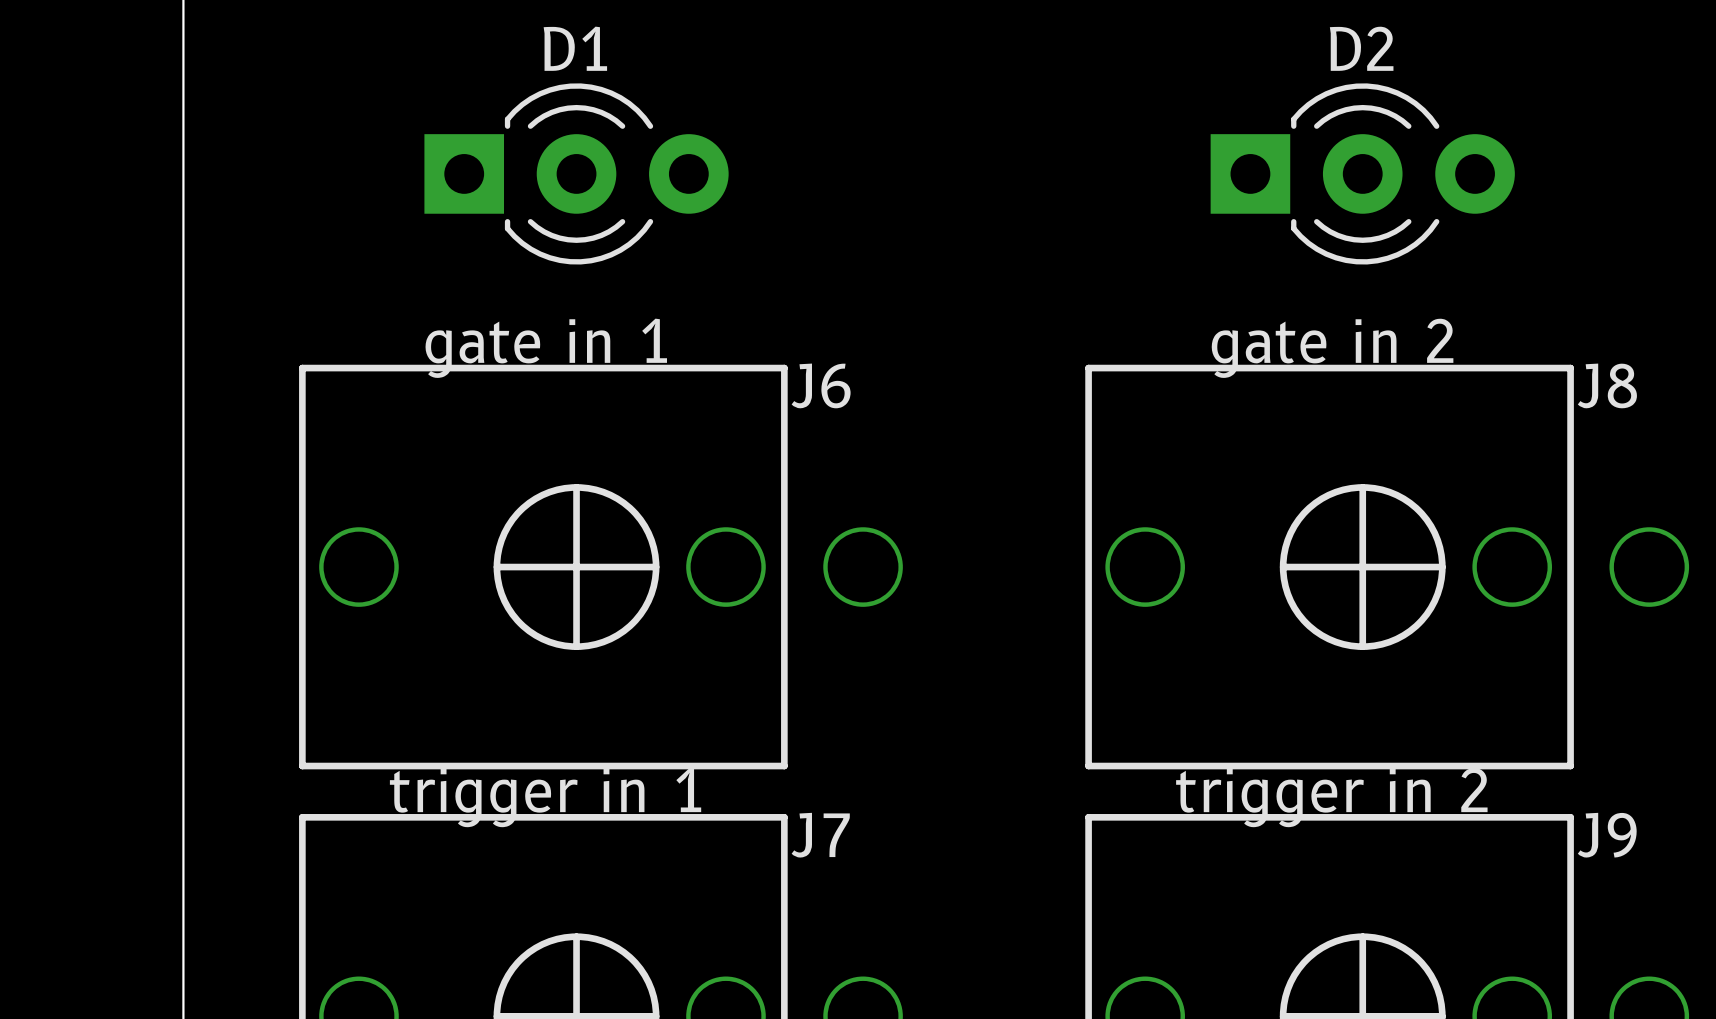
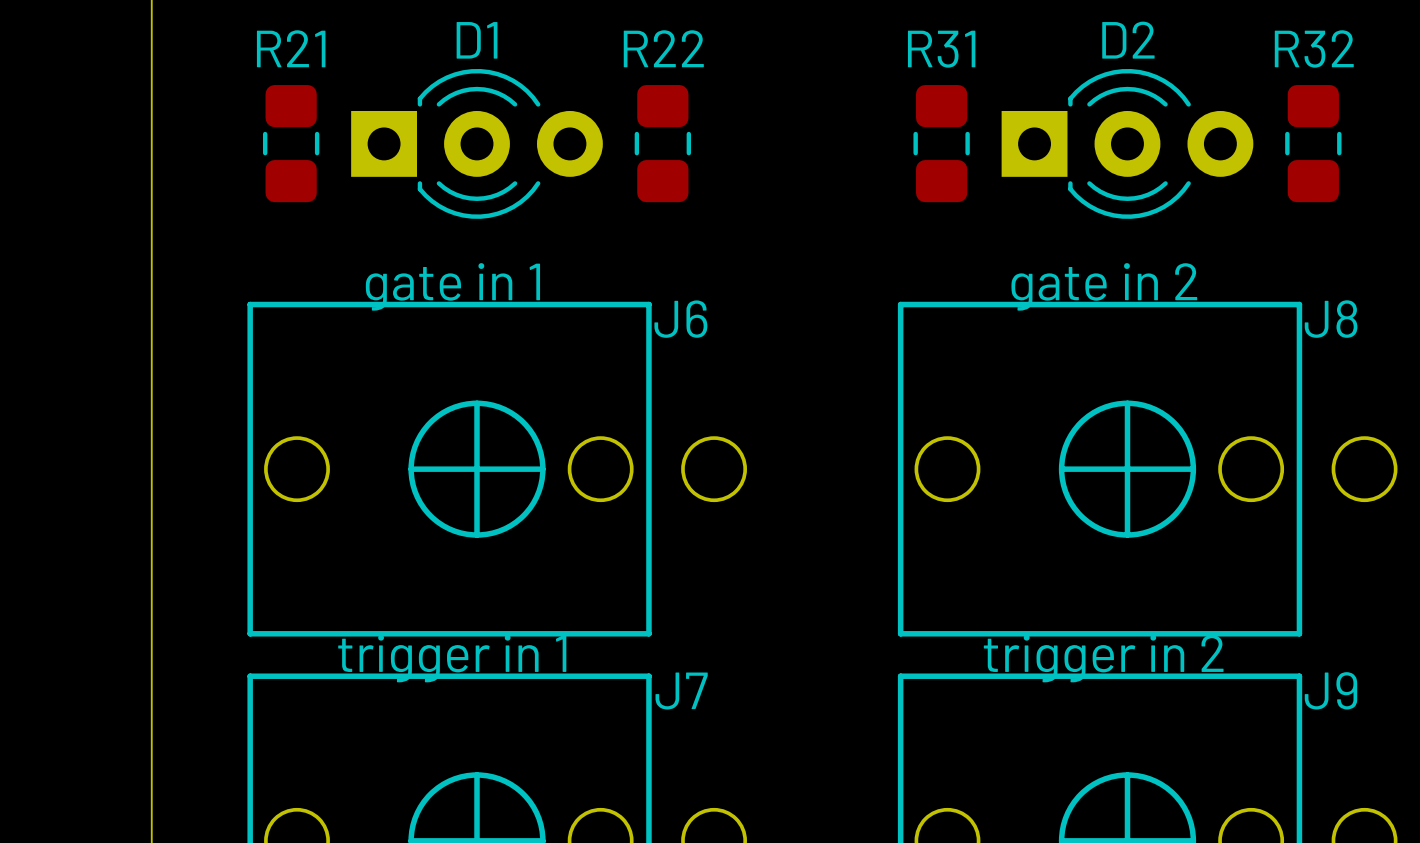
R21: none -> (291, 143)
R22: none -> (662, 143)
R31: none -> (941, 143)
R32: none -> (1313, 143)

